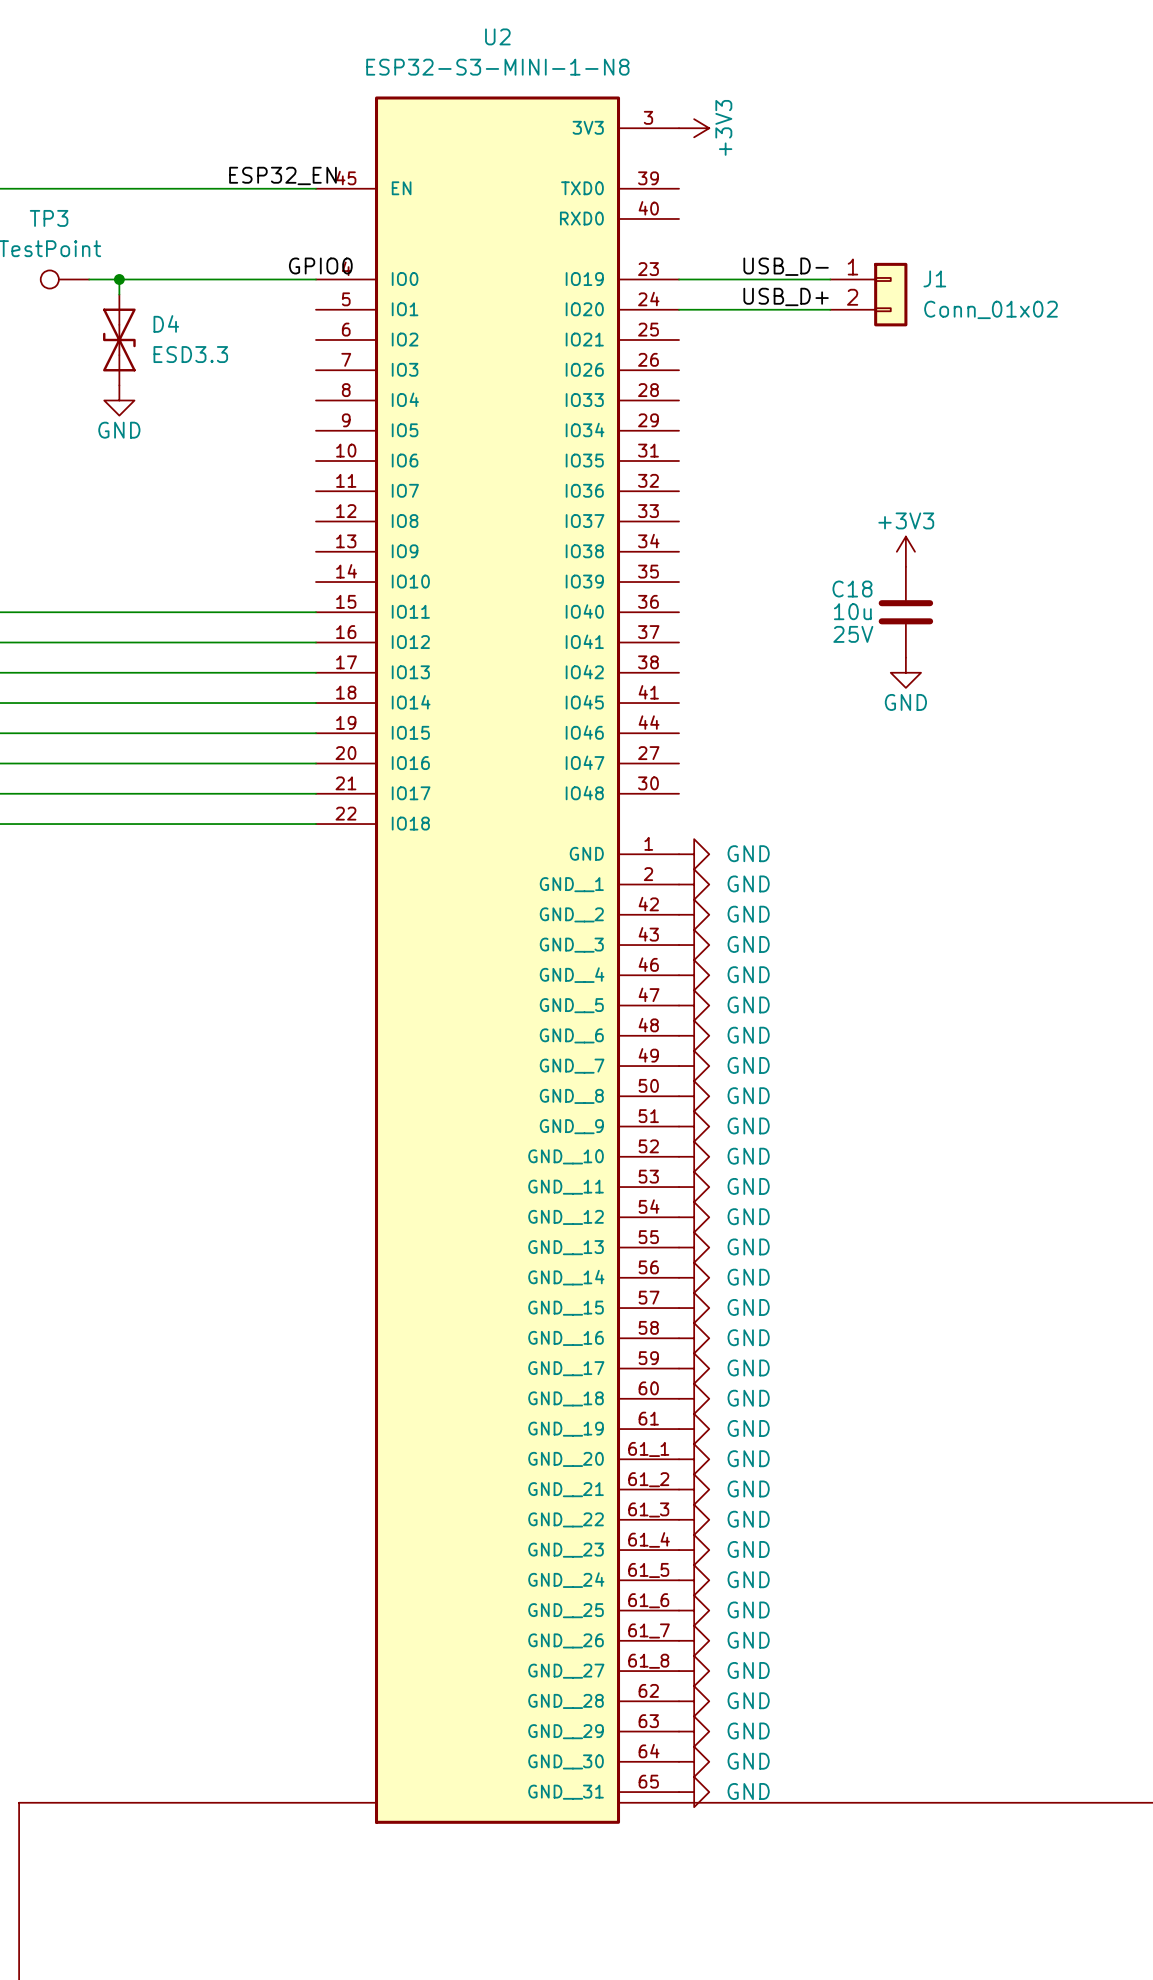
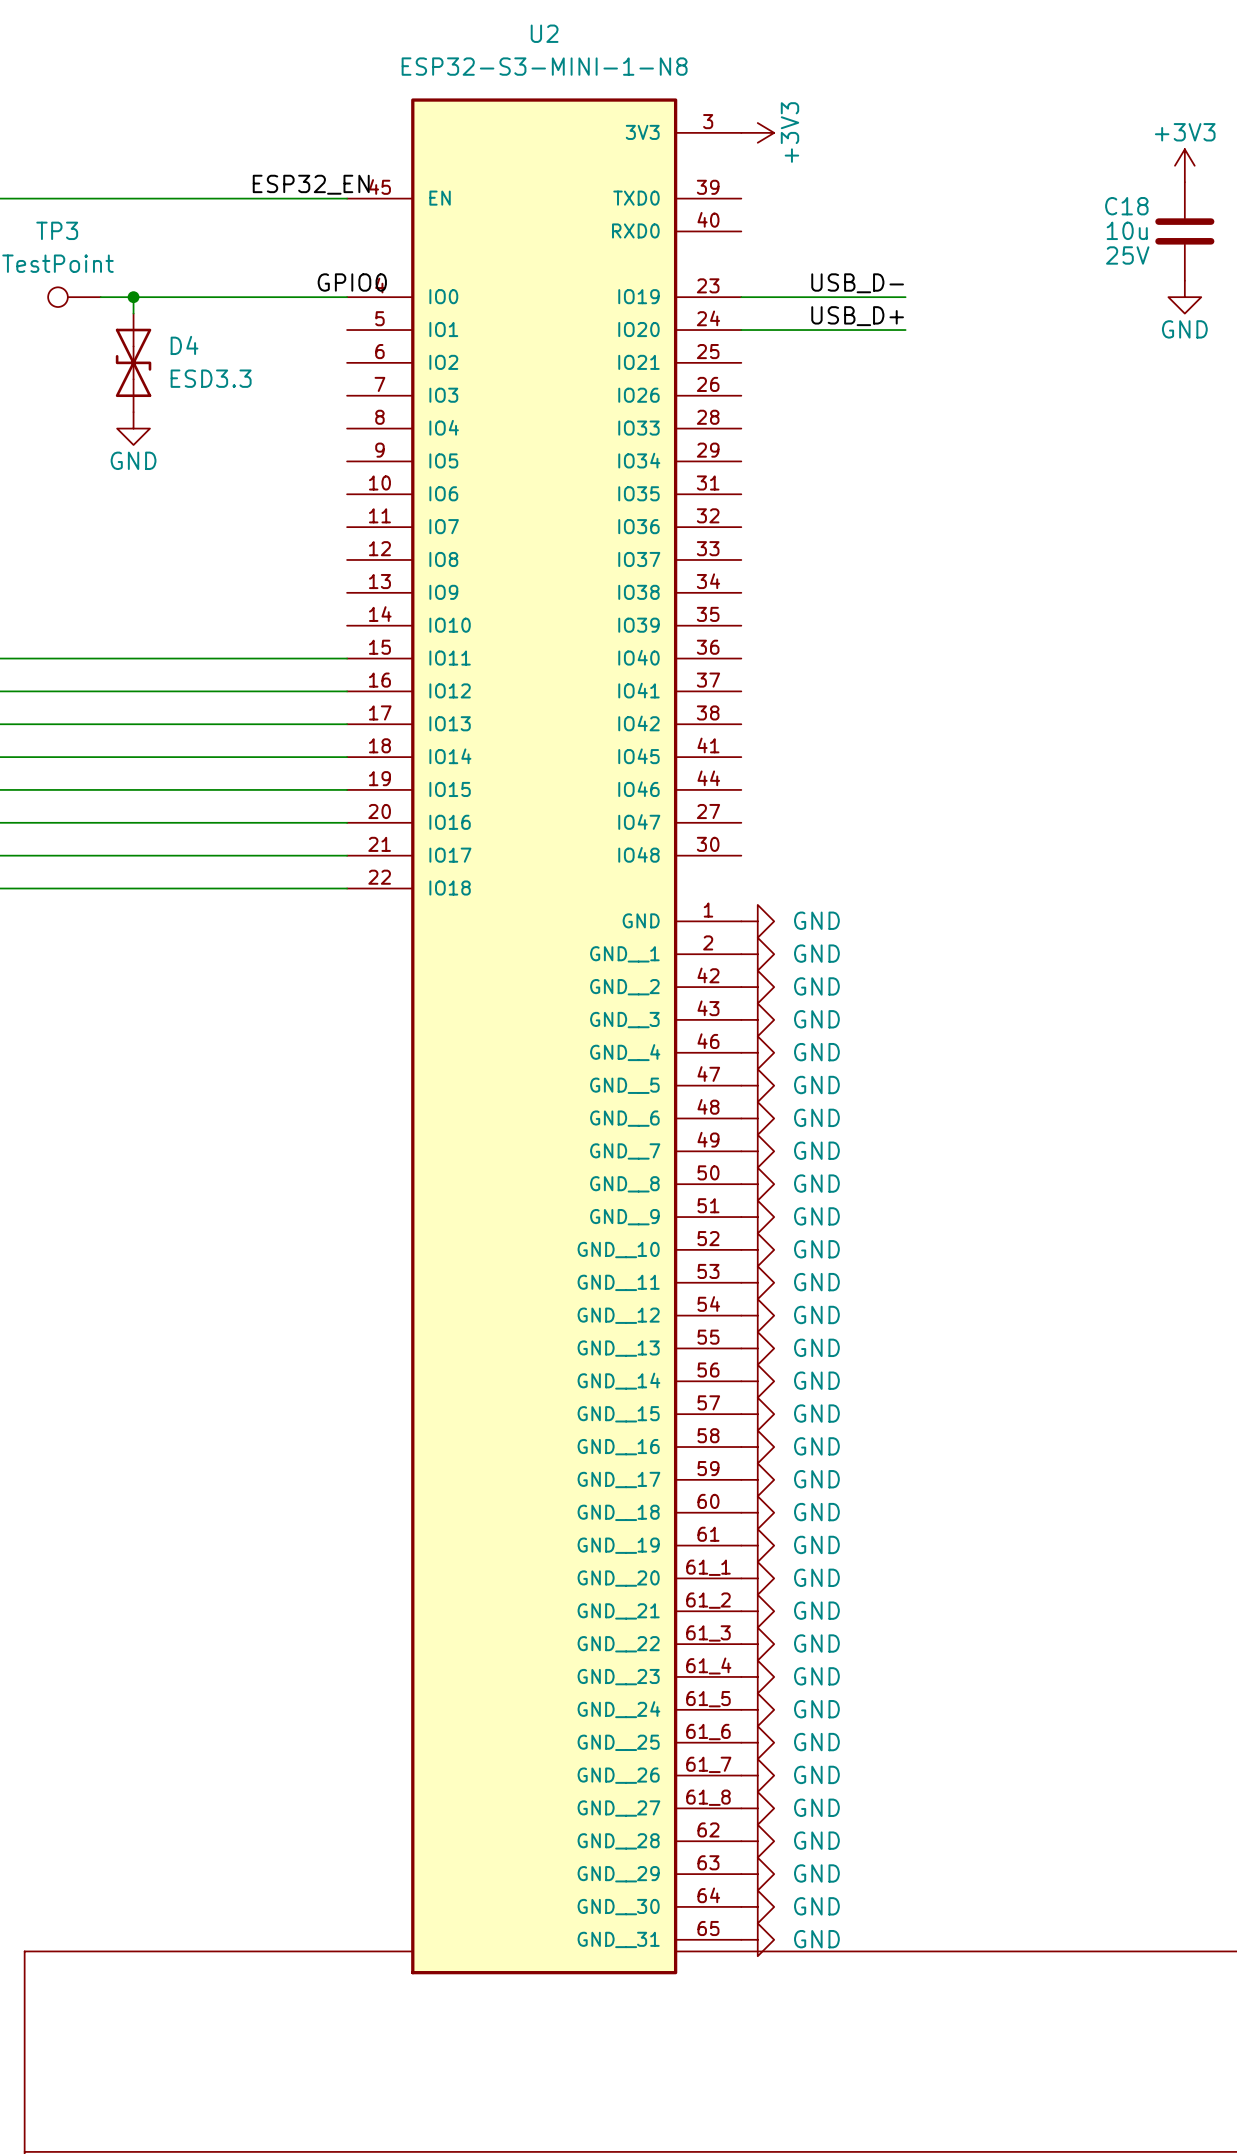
power symbol: none -> +3V3 (1184, 165)
power symbol: none -> GND (1184, 297)
J1: Conn_01x02 (868, 294) -> none
power symbol: +3V3 (905, 551) -> none
C18 position: (905, 612) -> (1184, 231)
power symbol: GND (905, 672) -> none

